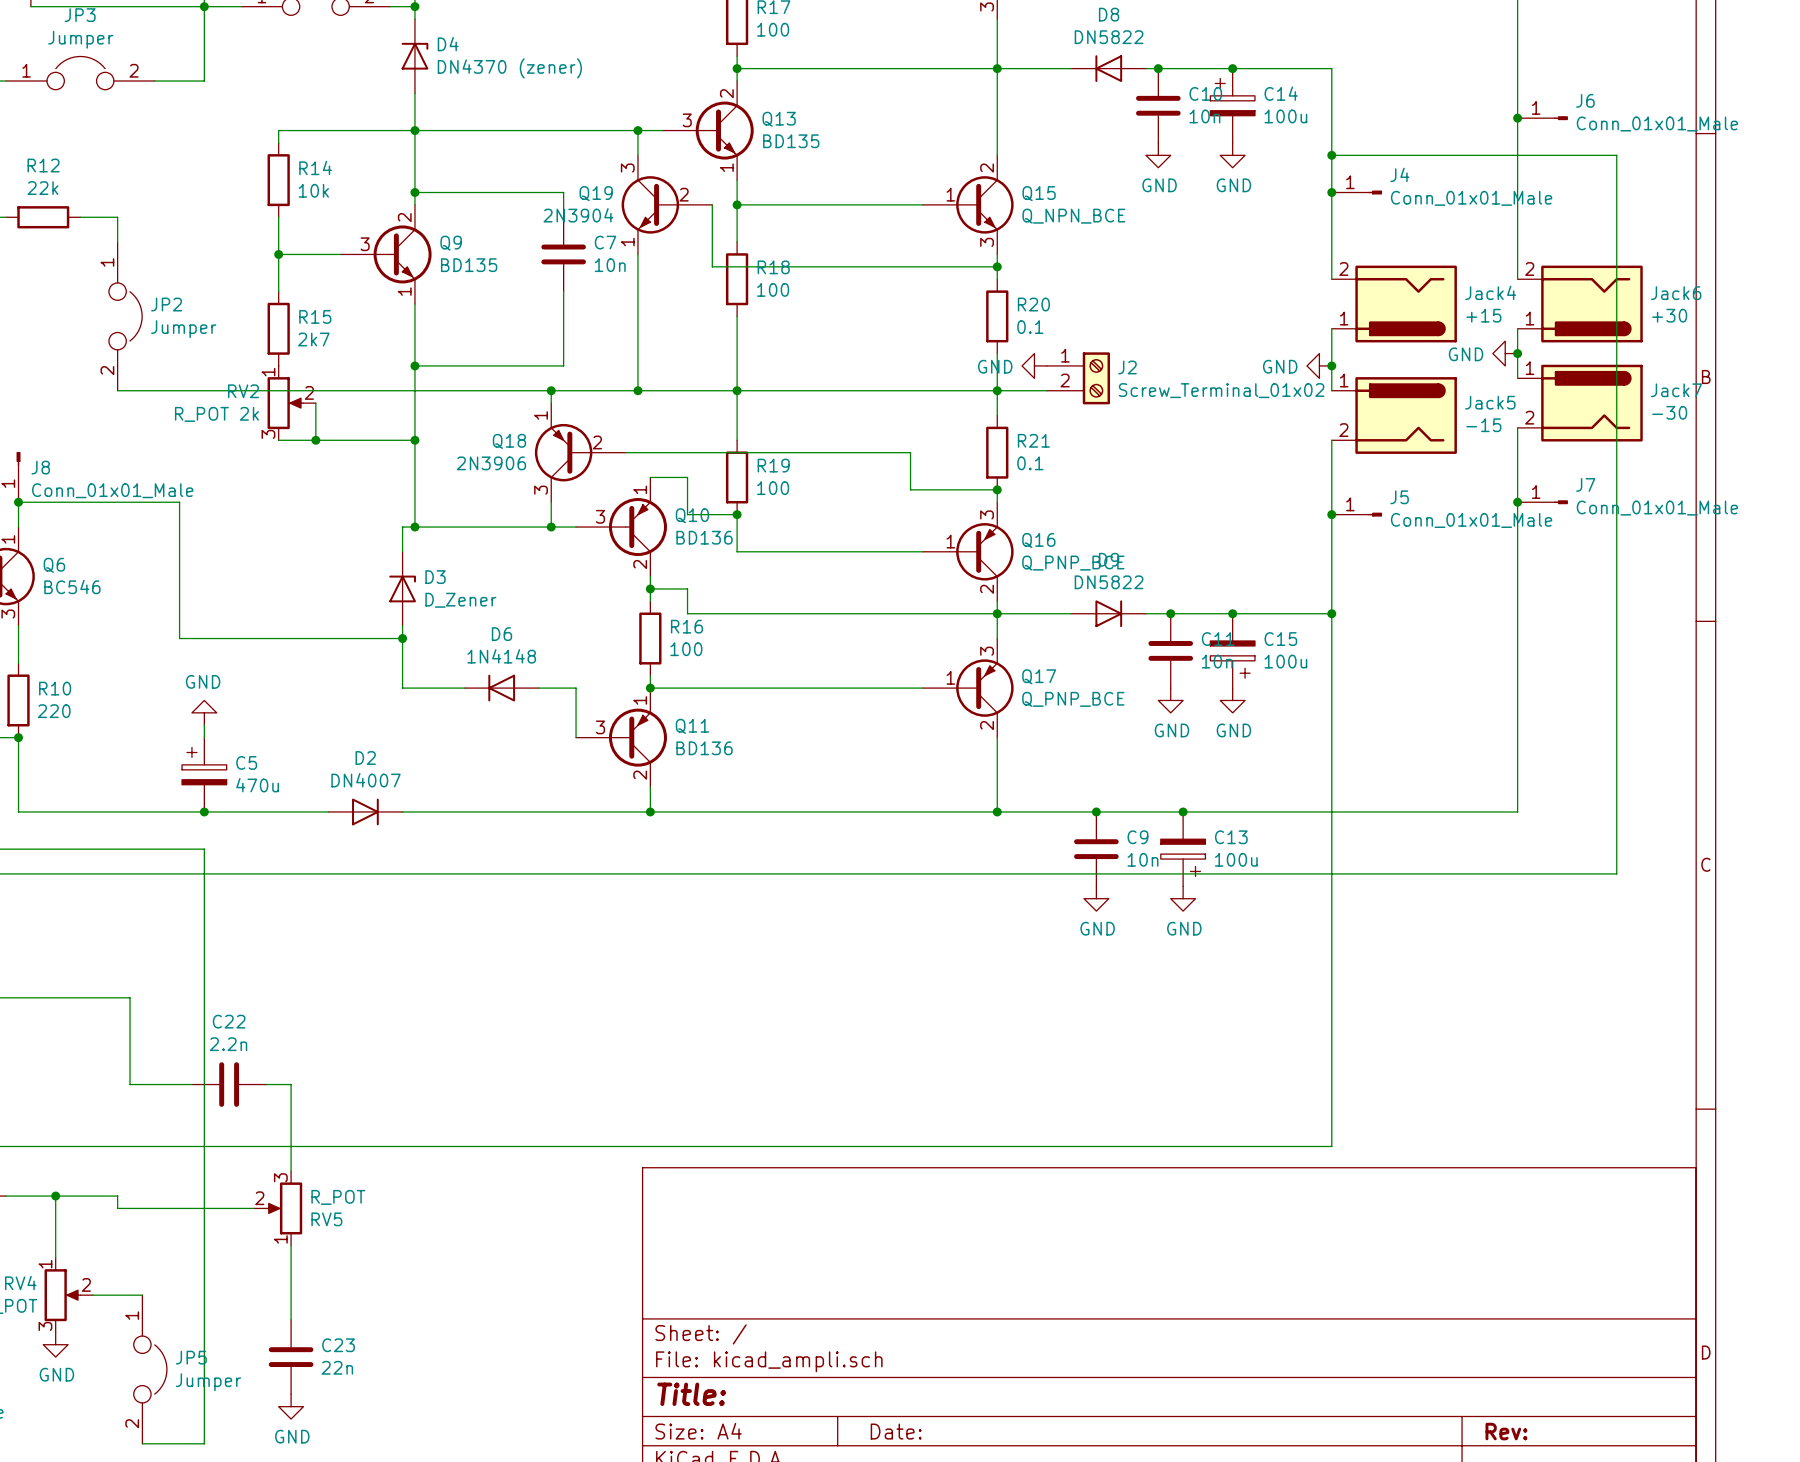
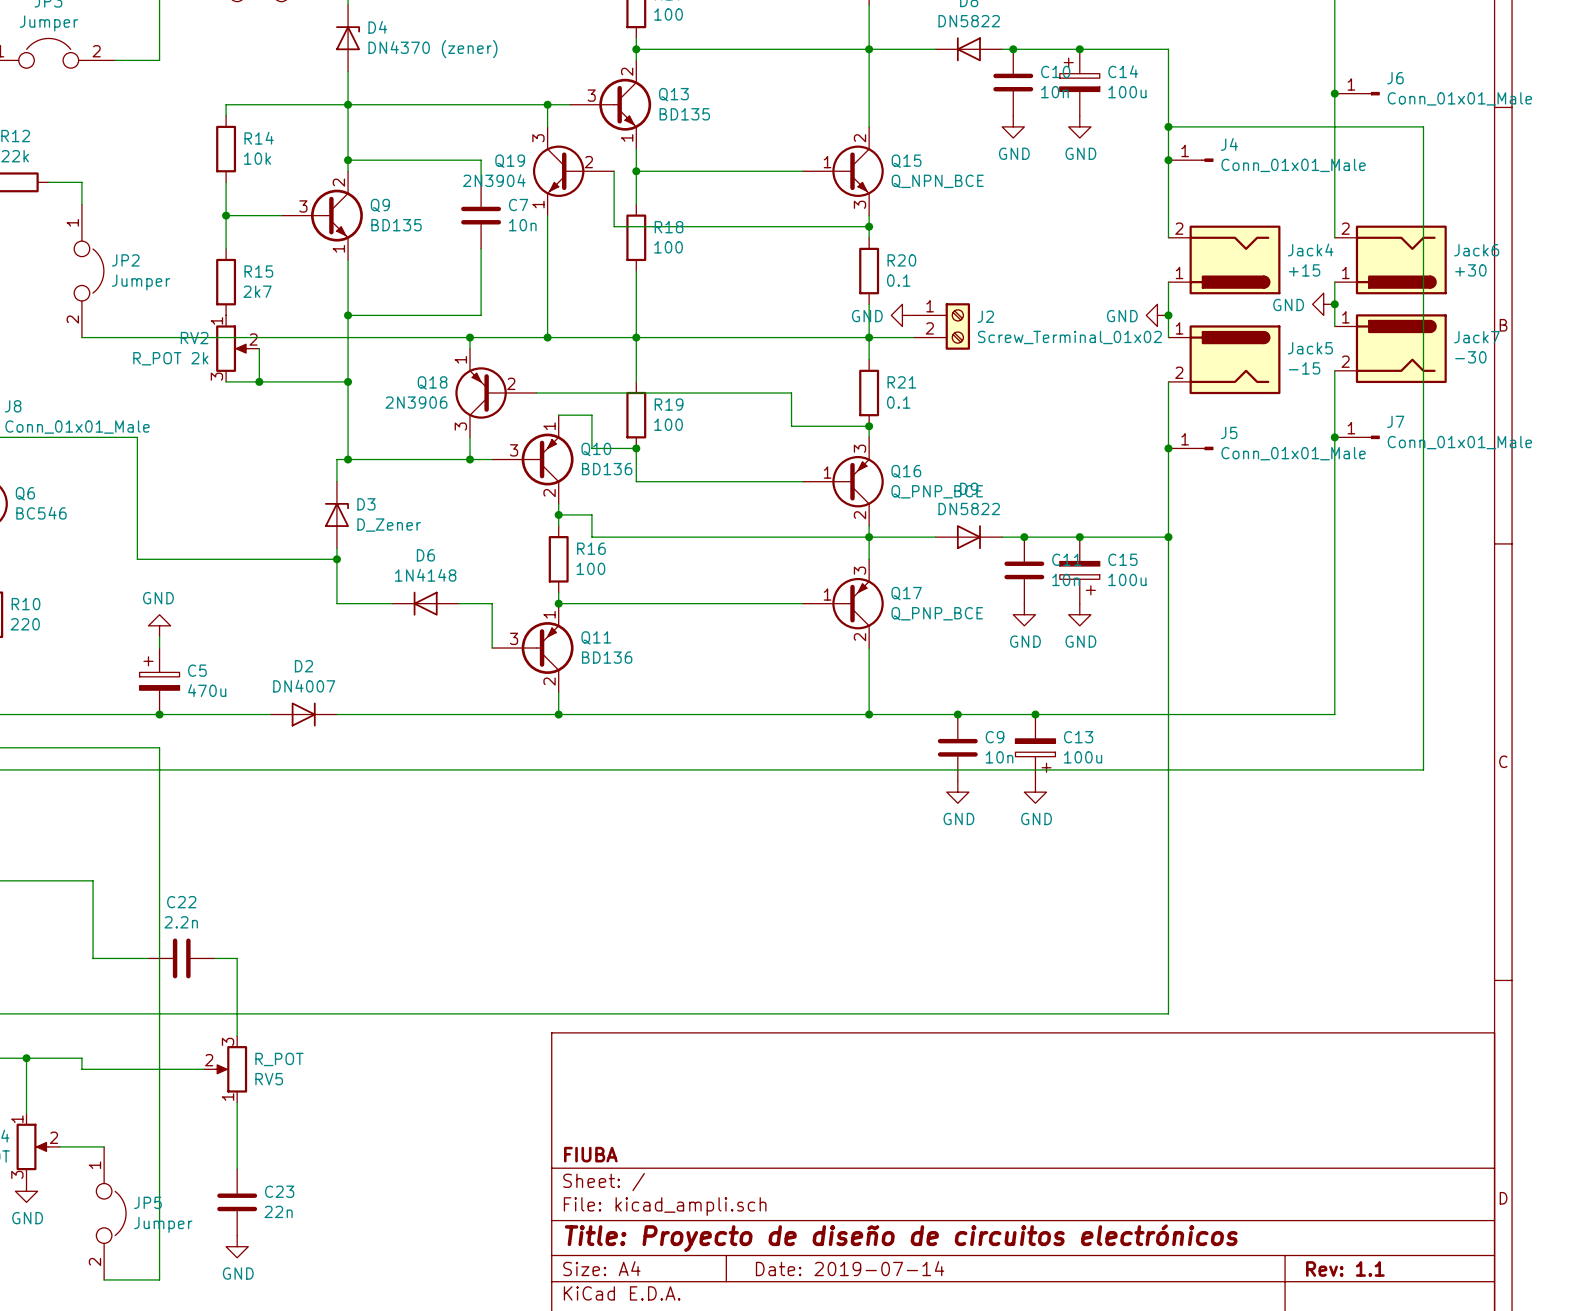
title block: none -> FIUBA (590, 1154)
title block: Title: (691, 1394) -> Title: Proyecto de diseño de circuitos electrónicos (901, 1238)
title block: Date: (896, 1431) -> Date: 2019-07-14 (850, 1268)
title block: Rev: (1506, 1431) -> Rev: 1.1 (1345, 1268)

